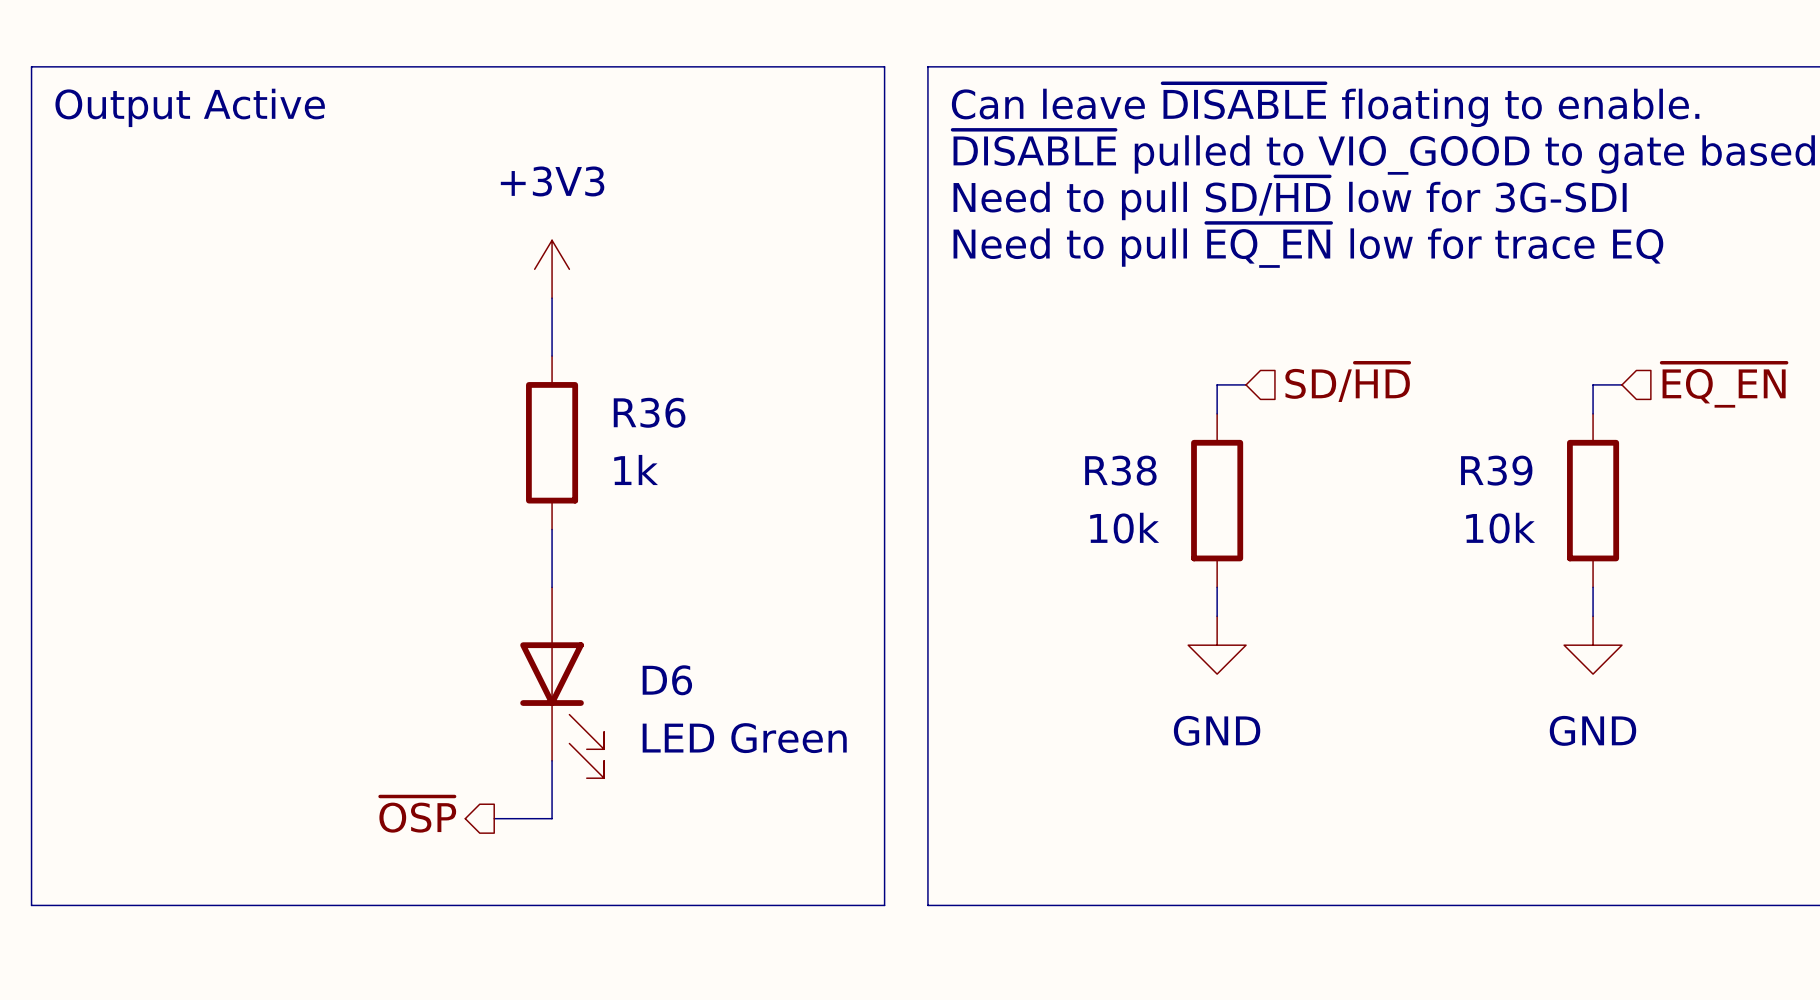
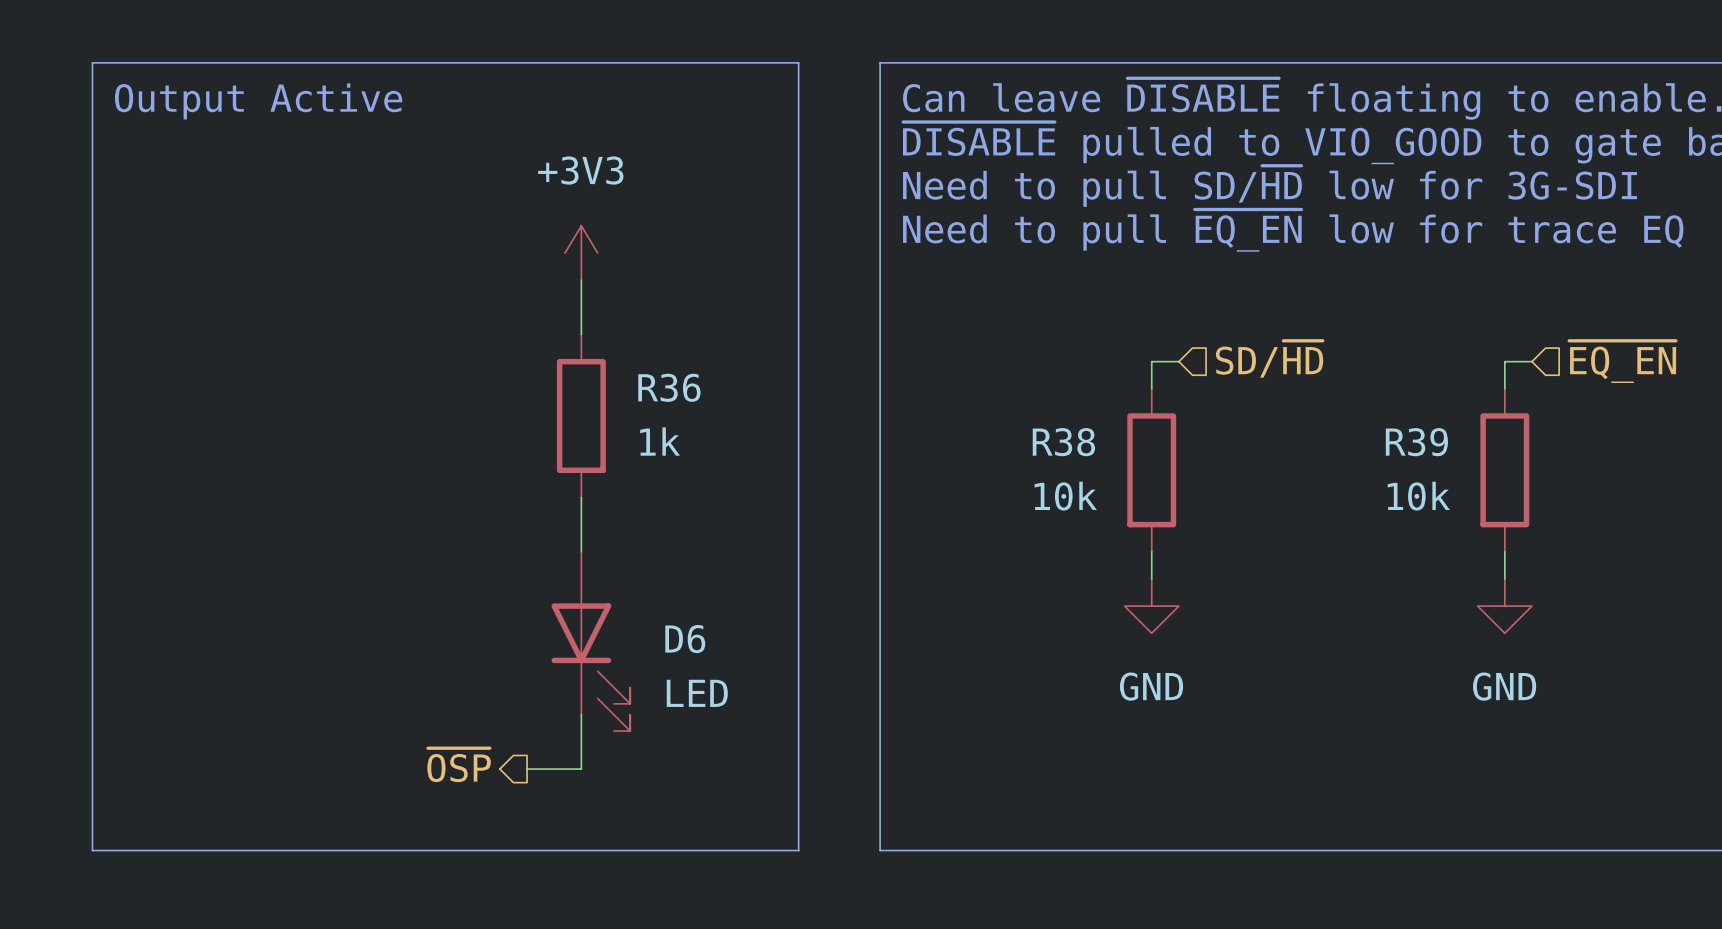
line: (89, 66) (31, 66) (31, 905) (89, 905) -> (92, 62) (92, 850)
line: (841, 66) (884, 66) (884, 905) (841, 905) -> (798, 62) (798, 850)
text position: Output Active (190, 107) -> Output Active (258, 101)
power symbol position: +3V3 (552, 269) -> +3V3 (581, 253)
wire: (552, 298) (552, 356) -> (581, 280) (581, 334)
R36 position: (552, 442) -> (581, 415)
wire: (552, 529) (552, 587) -> (581, 497) (581, 551)
D6 position: (562, 682) -> (590, 641)
D6 value: LED Green (744, 738) -> LED (697, 693)
wire: (552, 760) (552, 818) (494, 818) -> (581, 714) (581, 769) (527, 769)
hierarchical label position: ~{OSP} (417, 814) -> ~{OSP} (459, 765)

